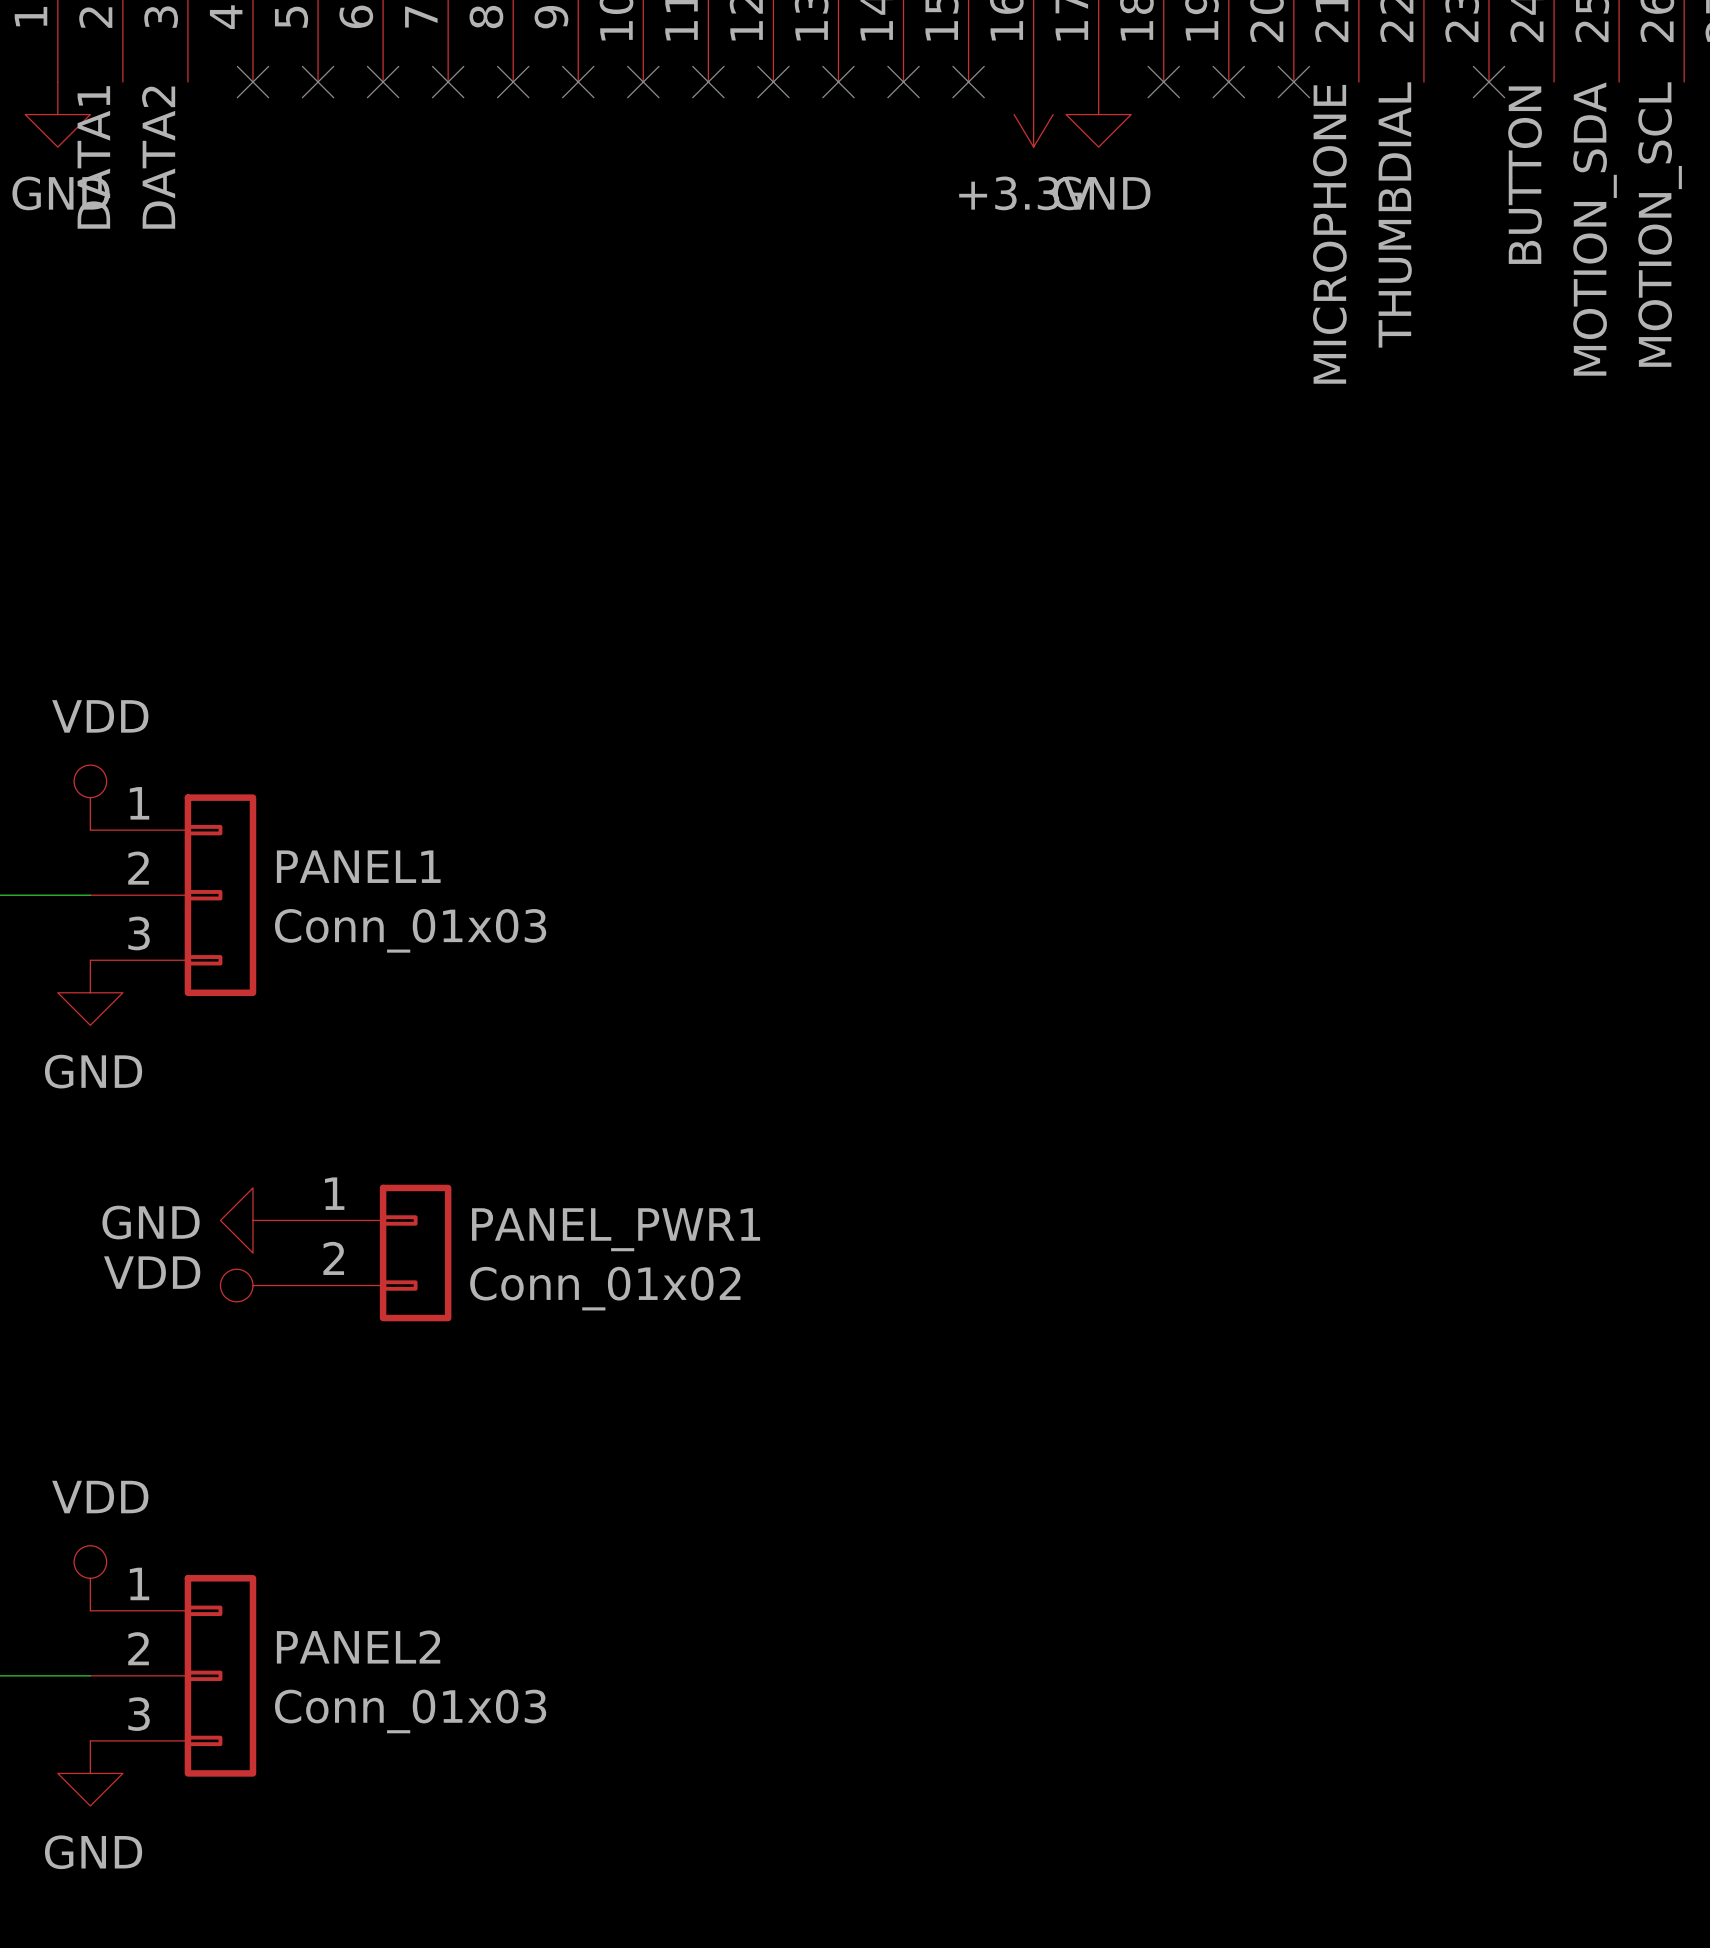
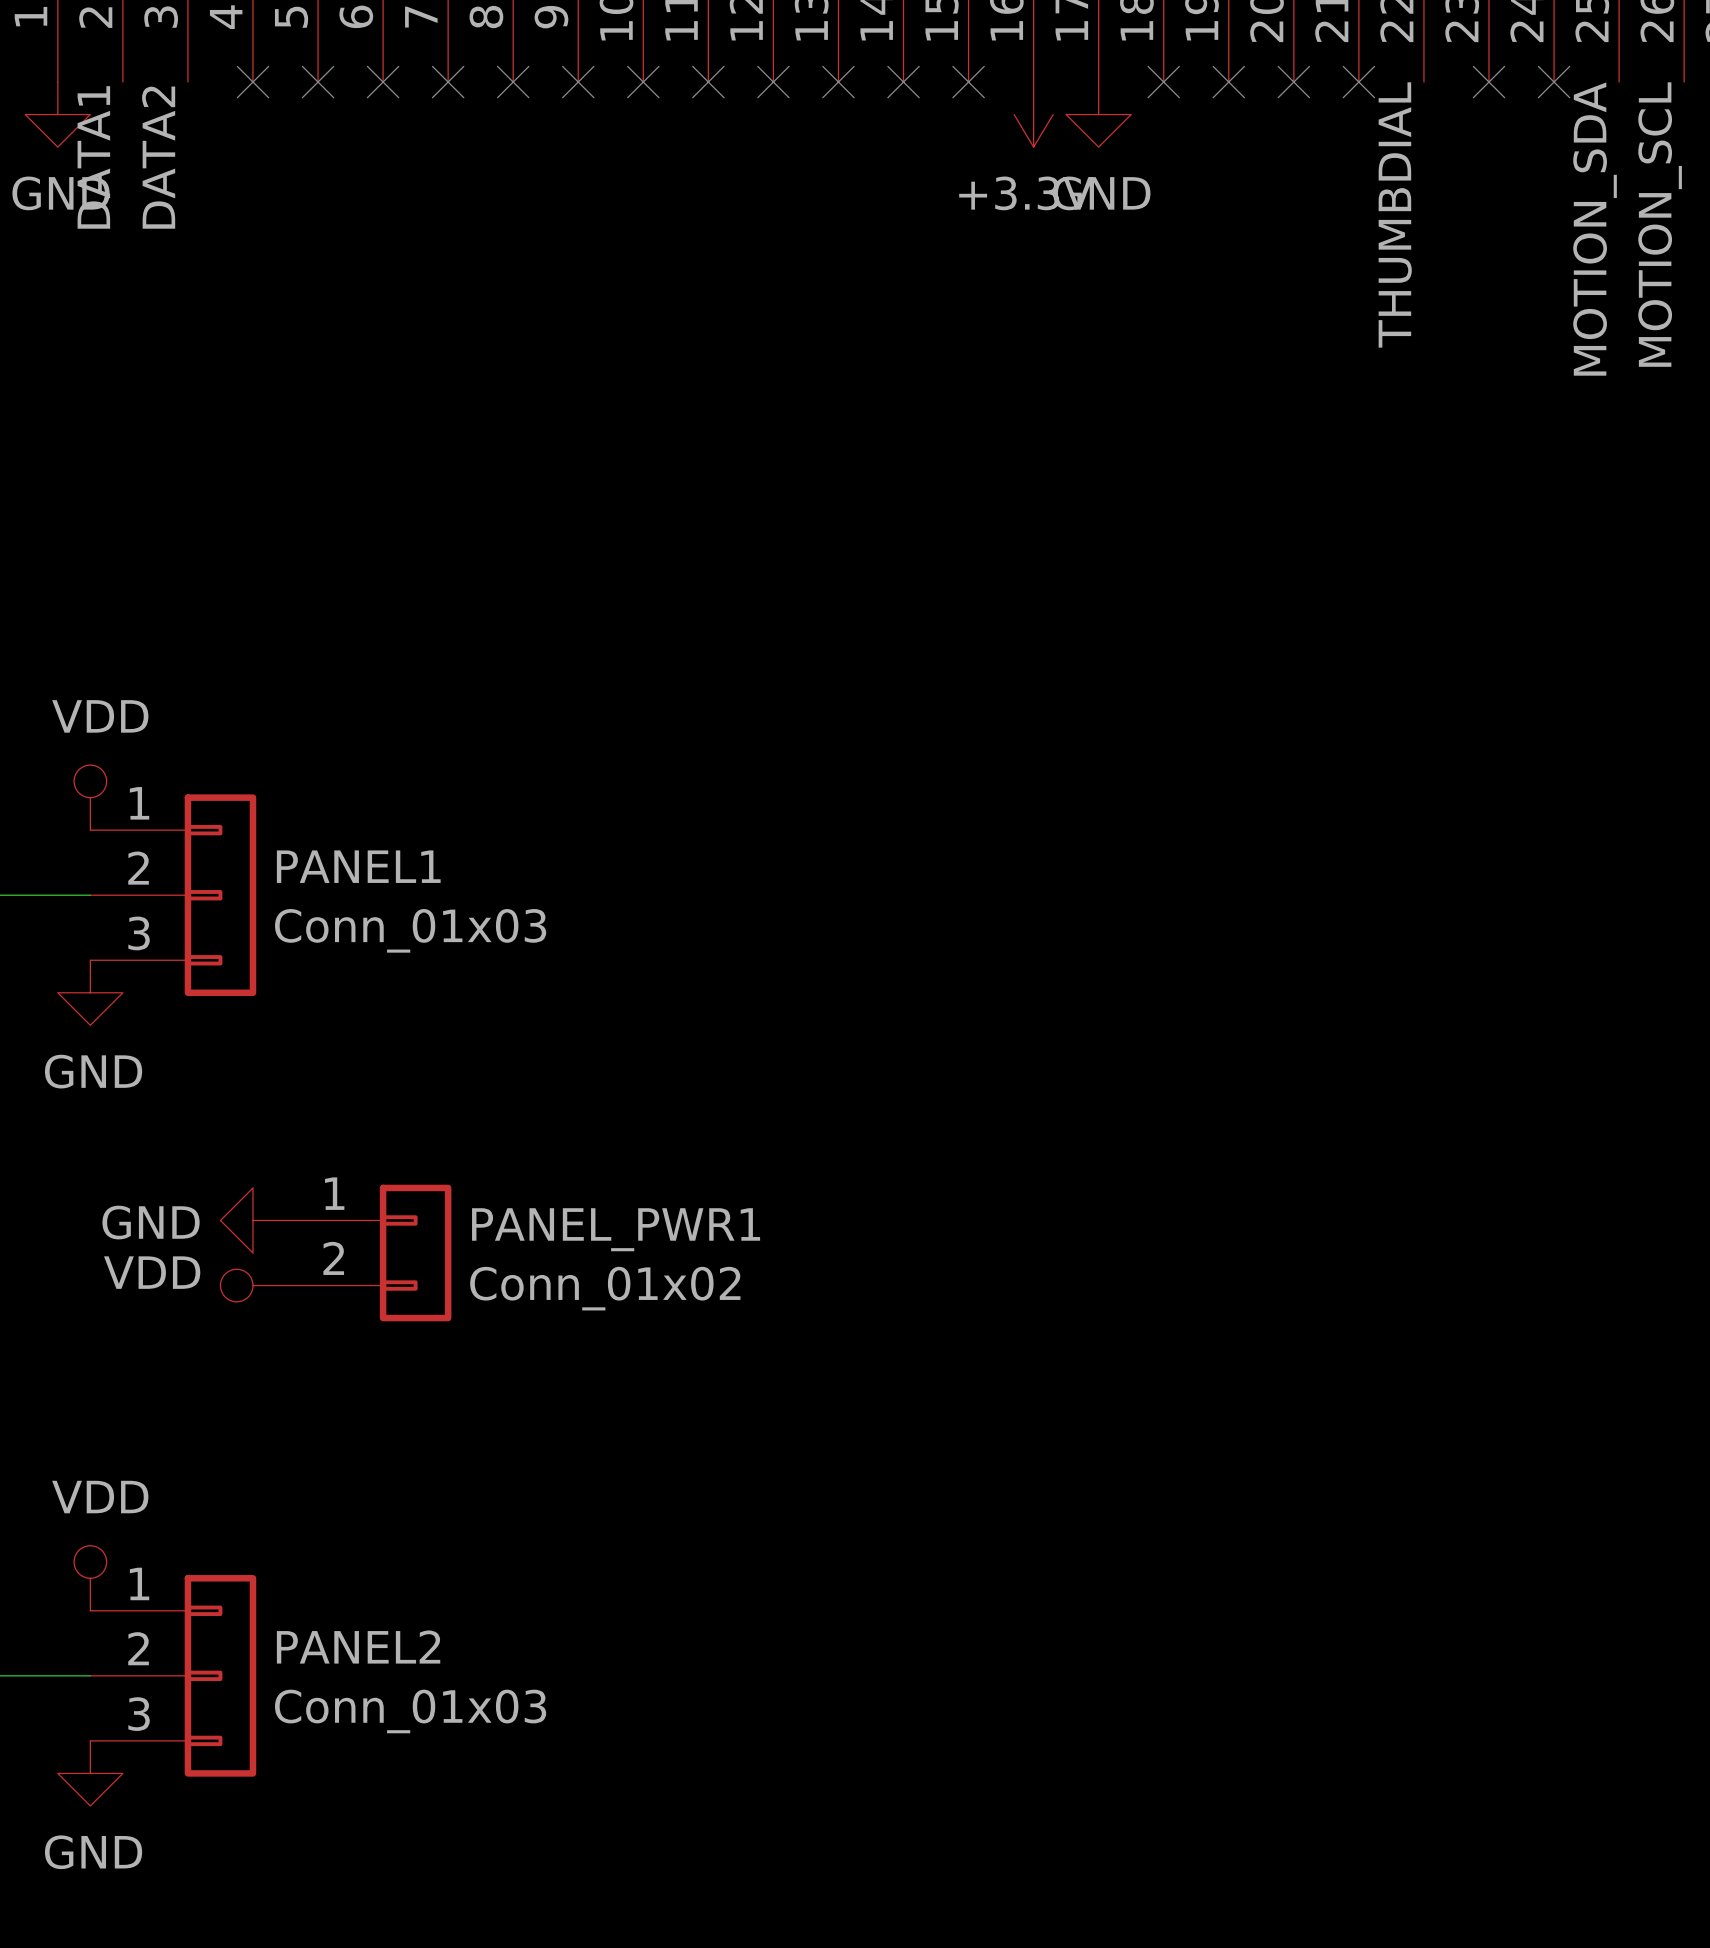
no-connect mark: none -> (1358, 82)
no-connect mark: none -> (1554, 82)
label: BUTTON (1525, 175) -> none
label: MICROPHONE (1329, 234) -> none

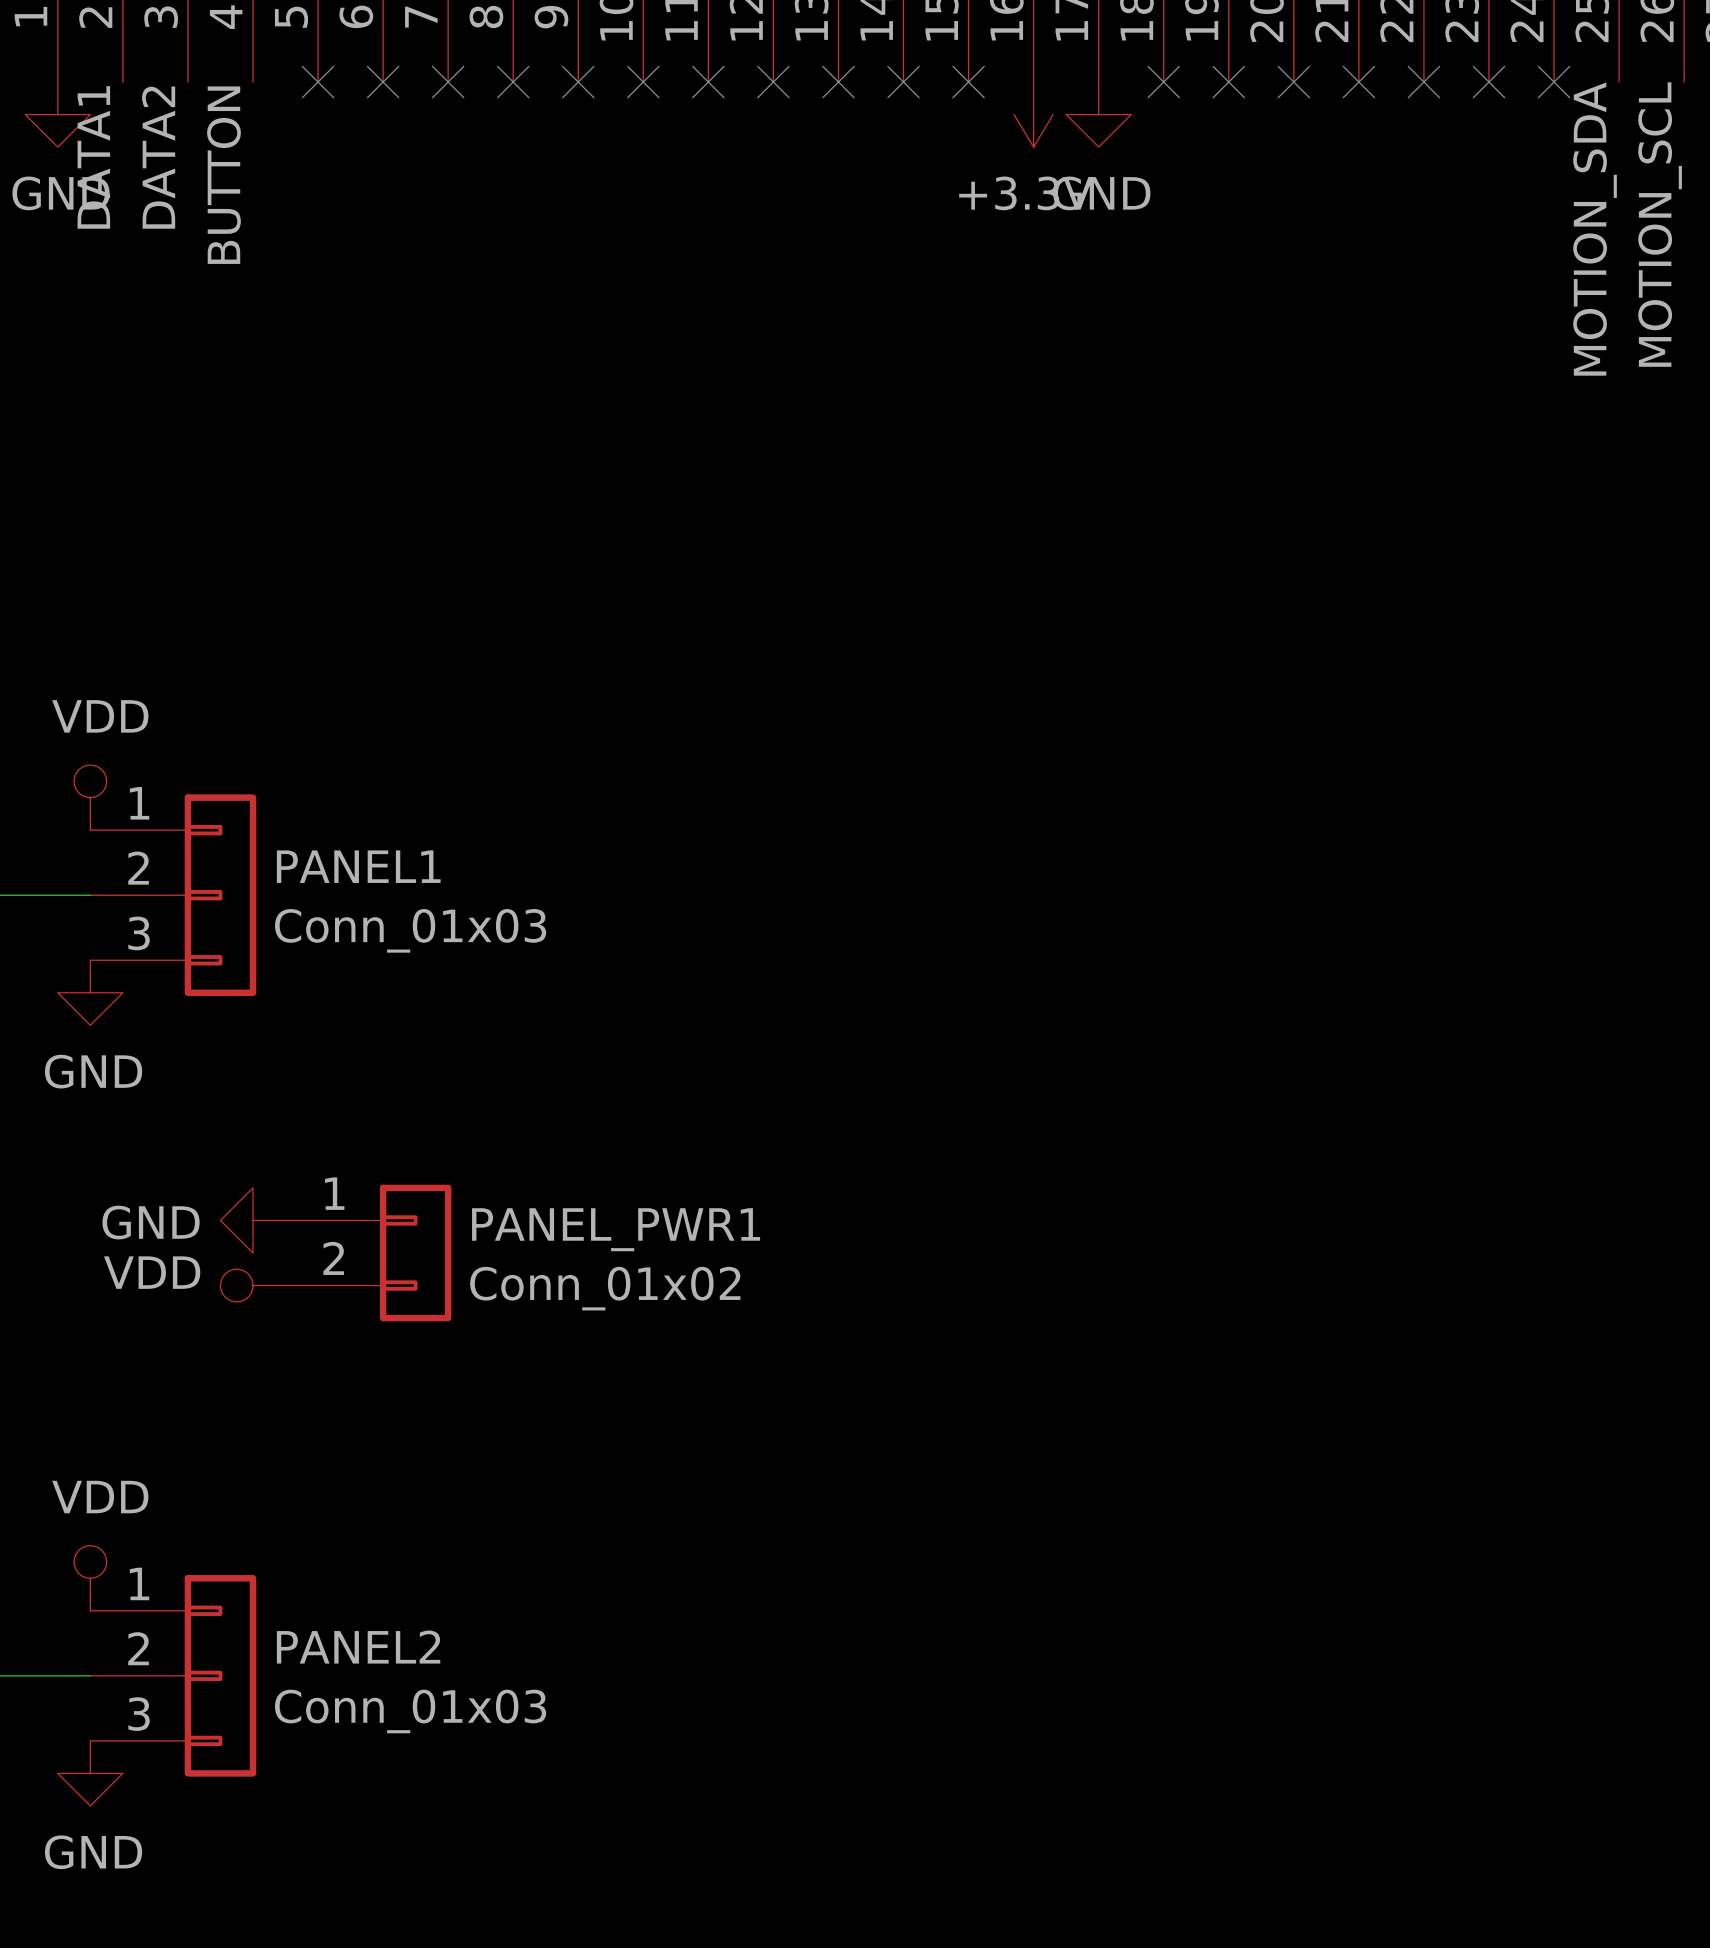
no-connect mark: (252, 82) -> none
no-connect mark: none -> (1423, 82)
label: none -> BUTTON (223, 175)
label: THUMBDIAL (1395, 214) -> none

